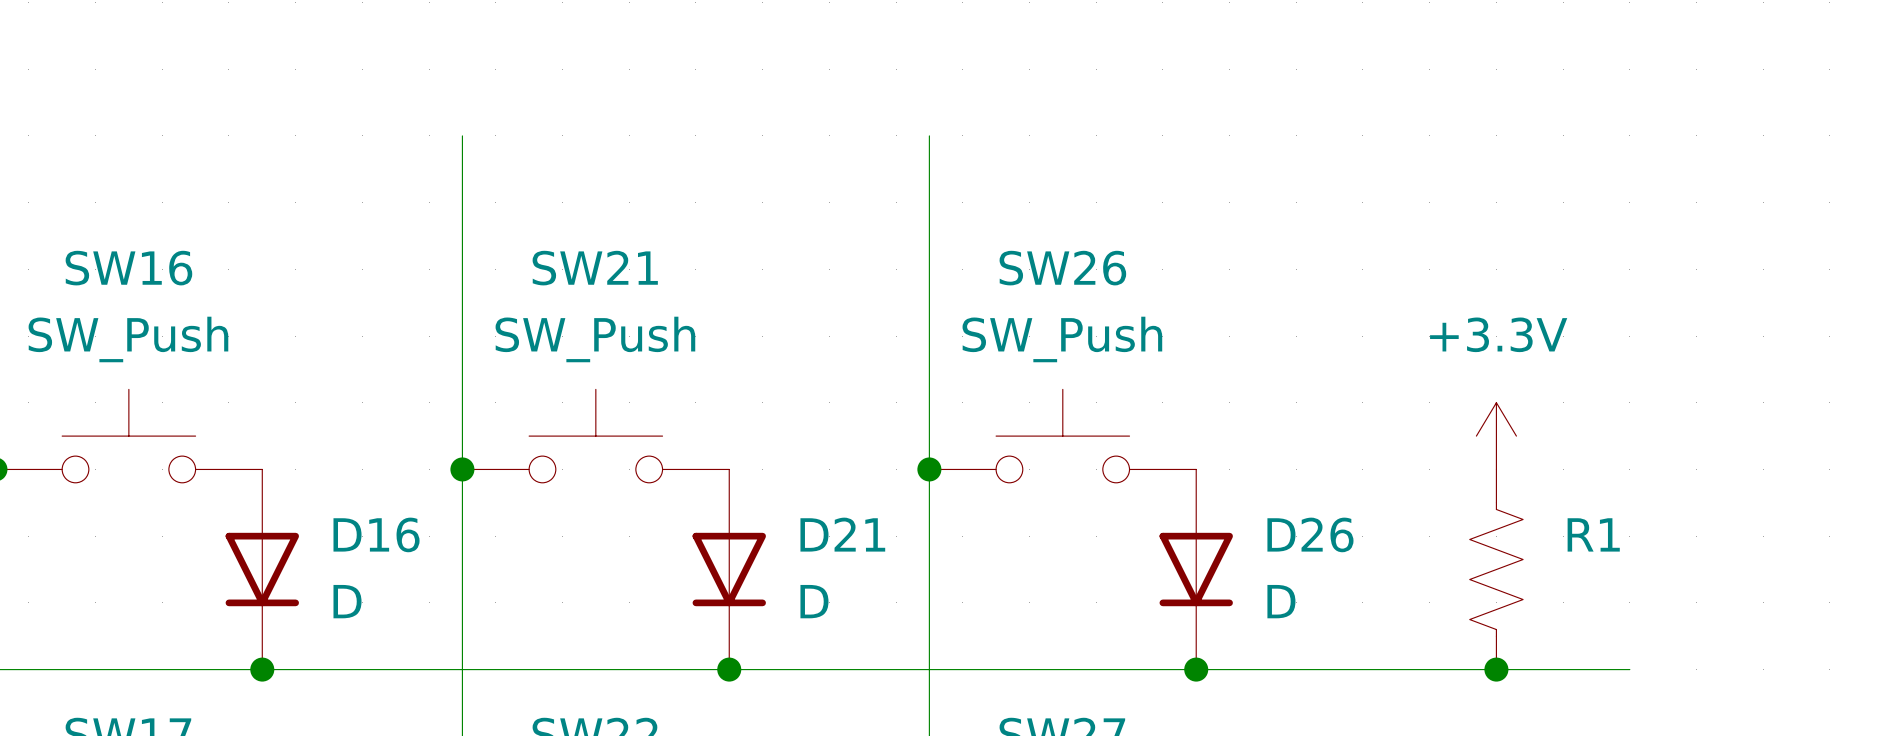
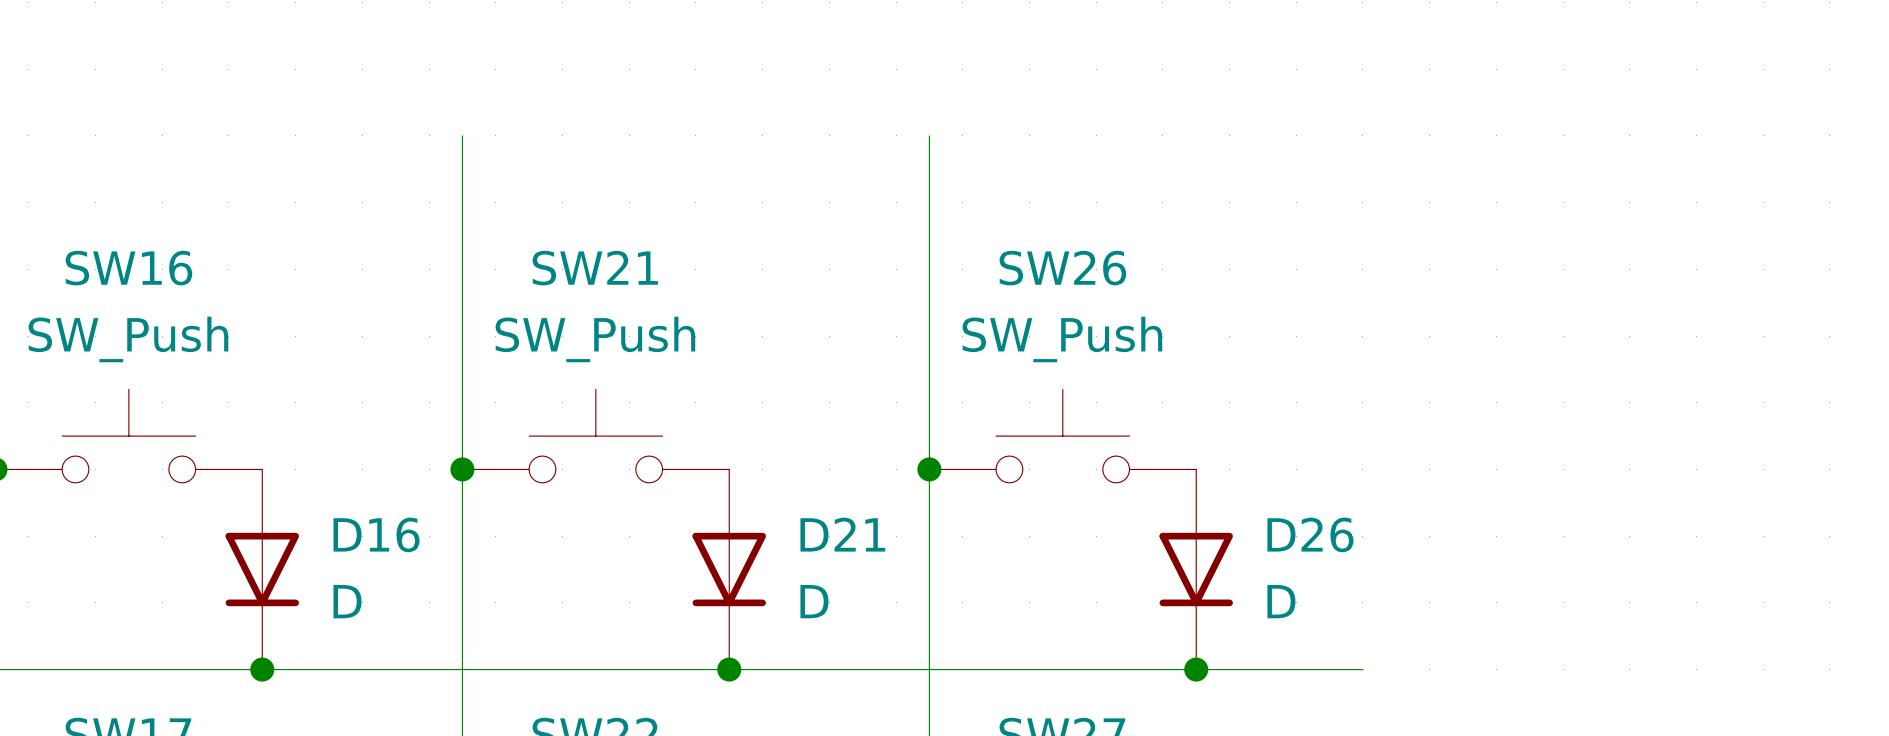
power symbol: +3.3V (1496, 436) -> none
R1: (1496, 569) -> none
wire: (1362, 669) (1629, 669) -> none
junction: (1496, 669) -> none

